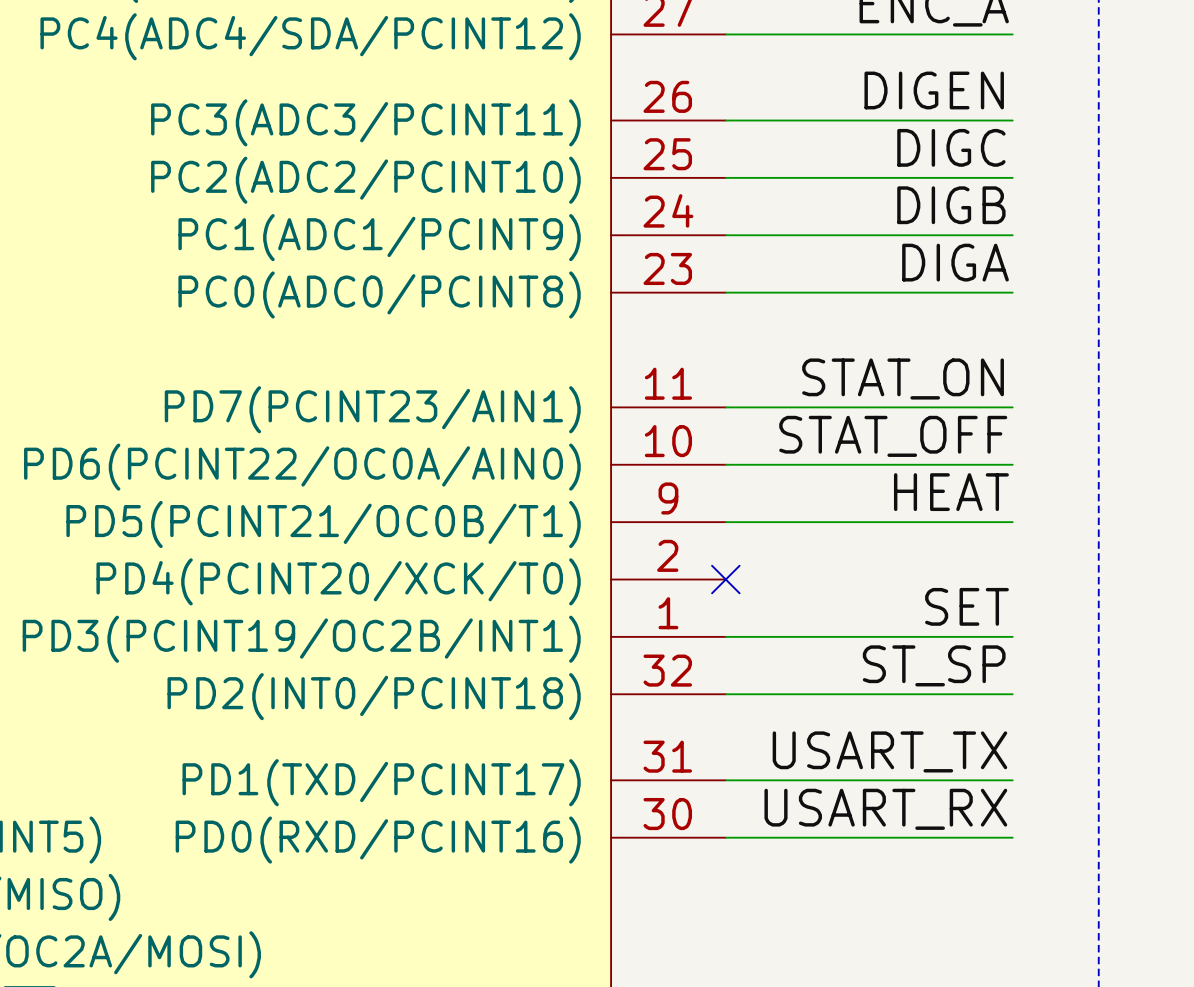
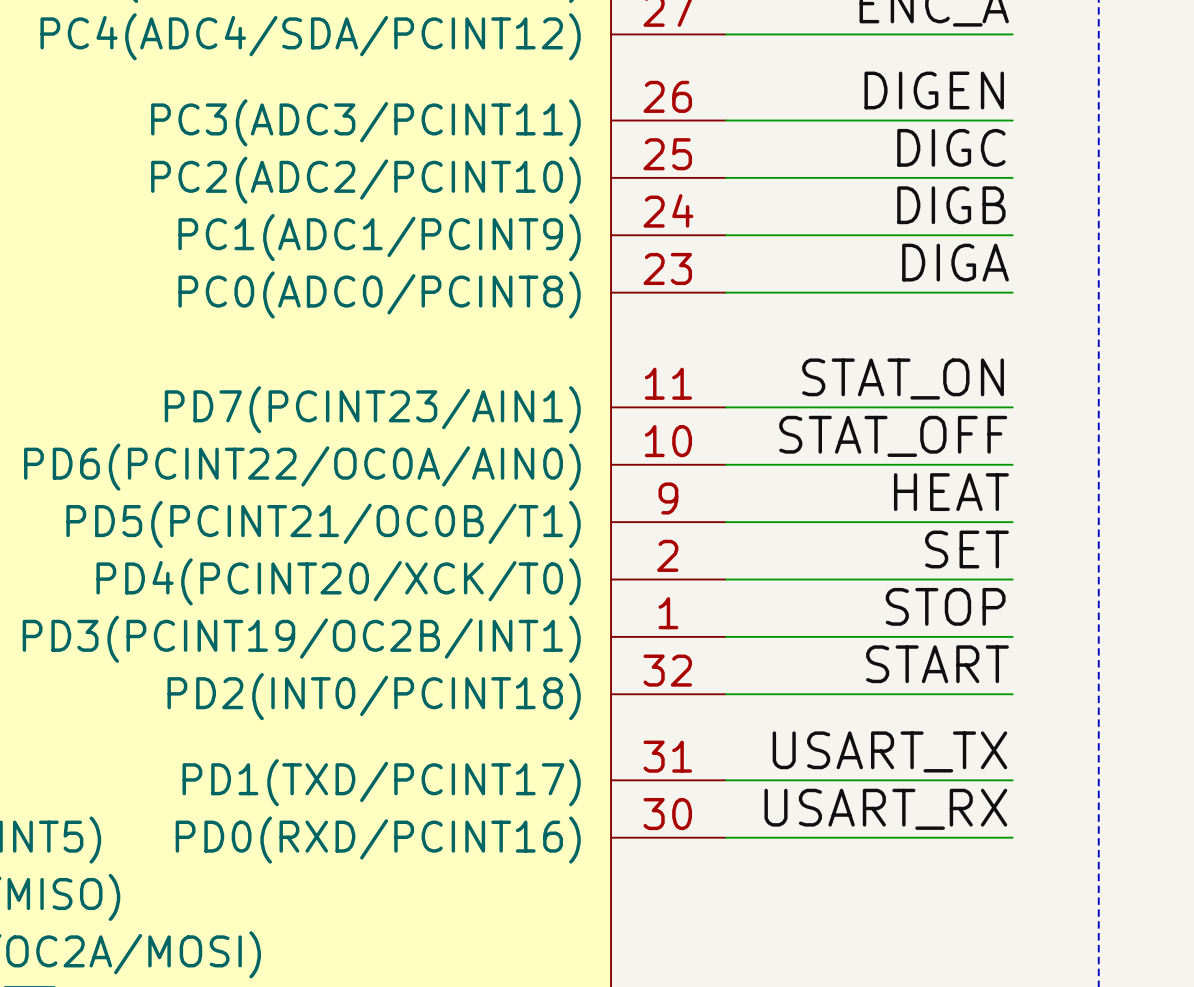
label: none -> SET (966, 549)
wire: none -> (725, 579) (1012, 579)
no-connect mark: (725, 579) -> none
label: SET (966, 606) -> STOP (945, 606)
label: ST_SP (934, 665) -> START (937, 664)

